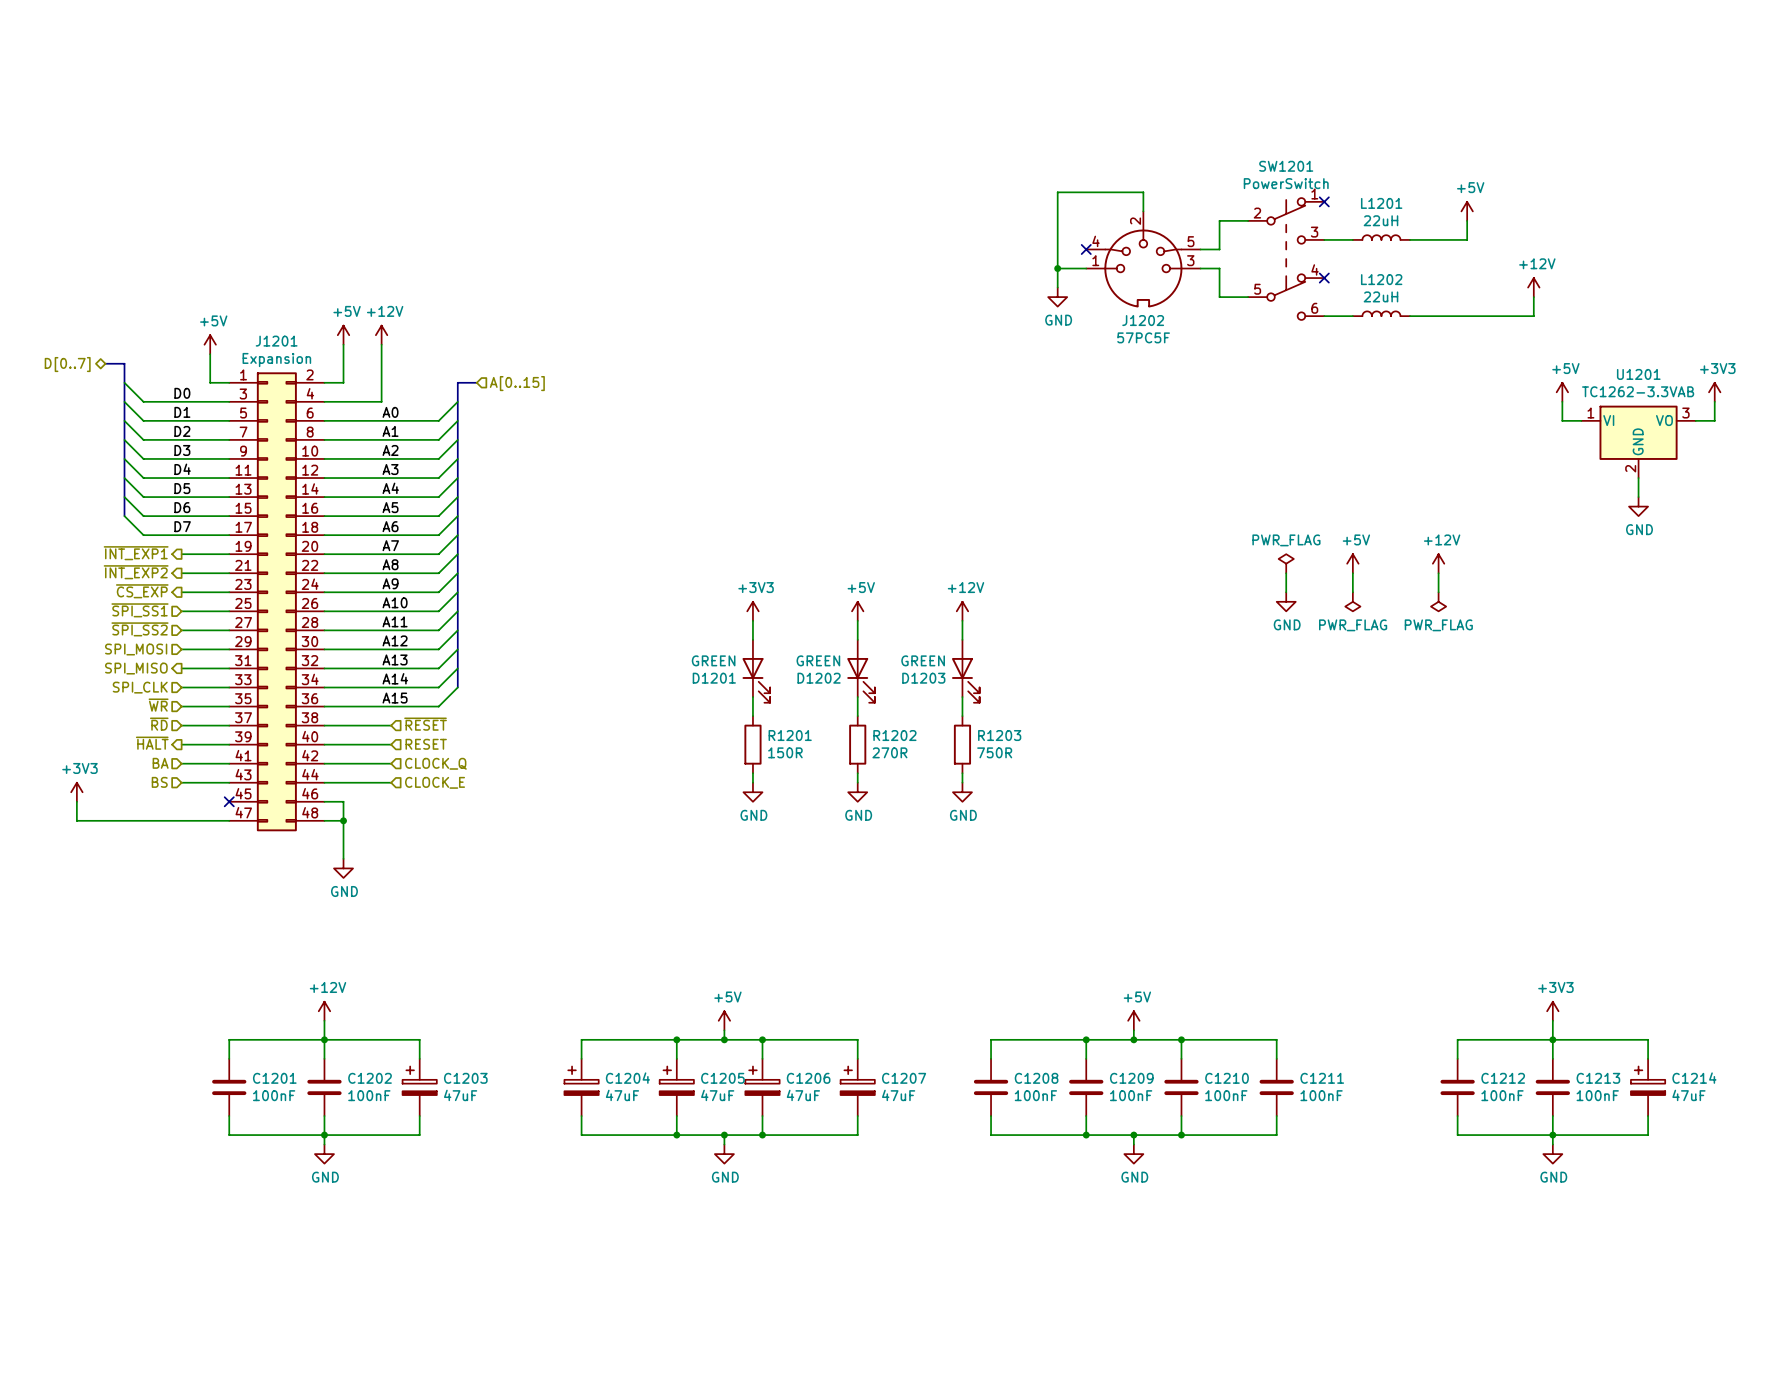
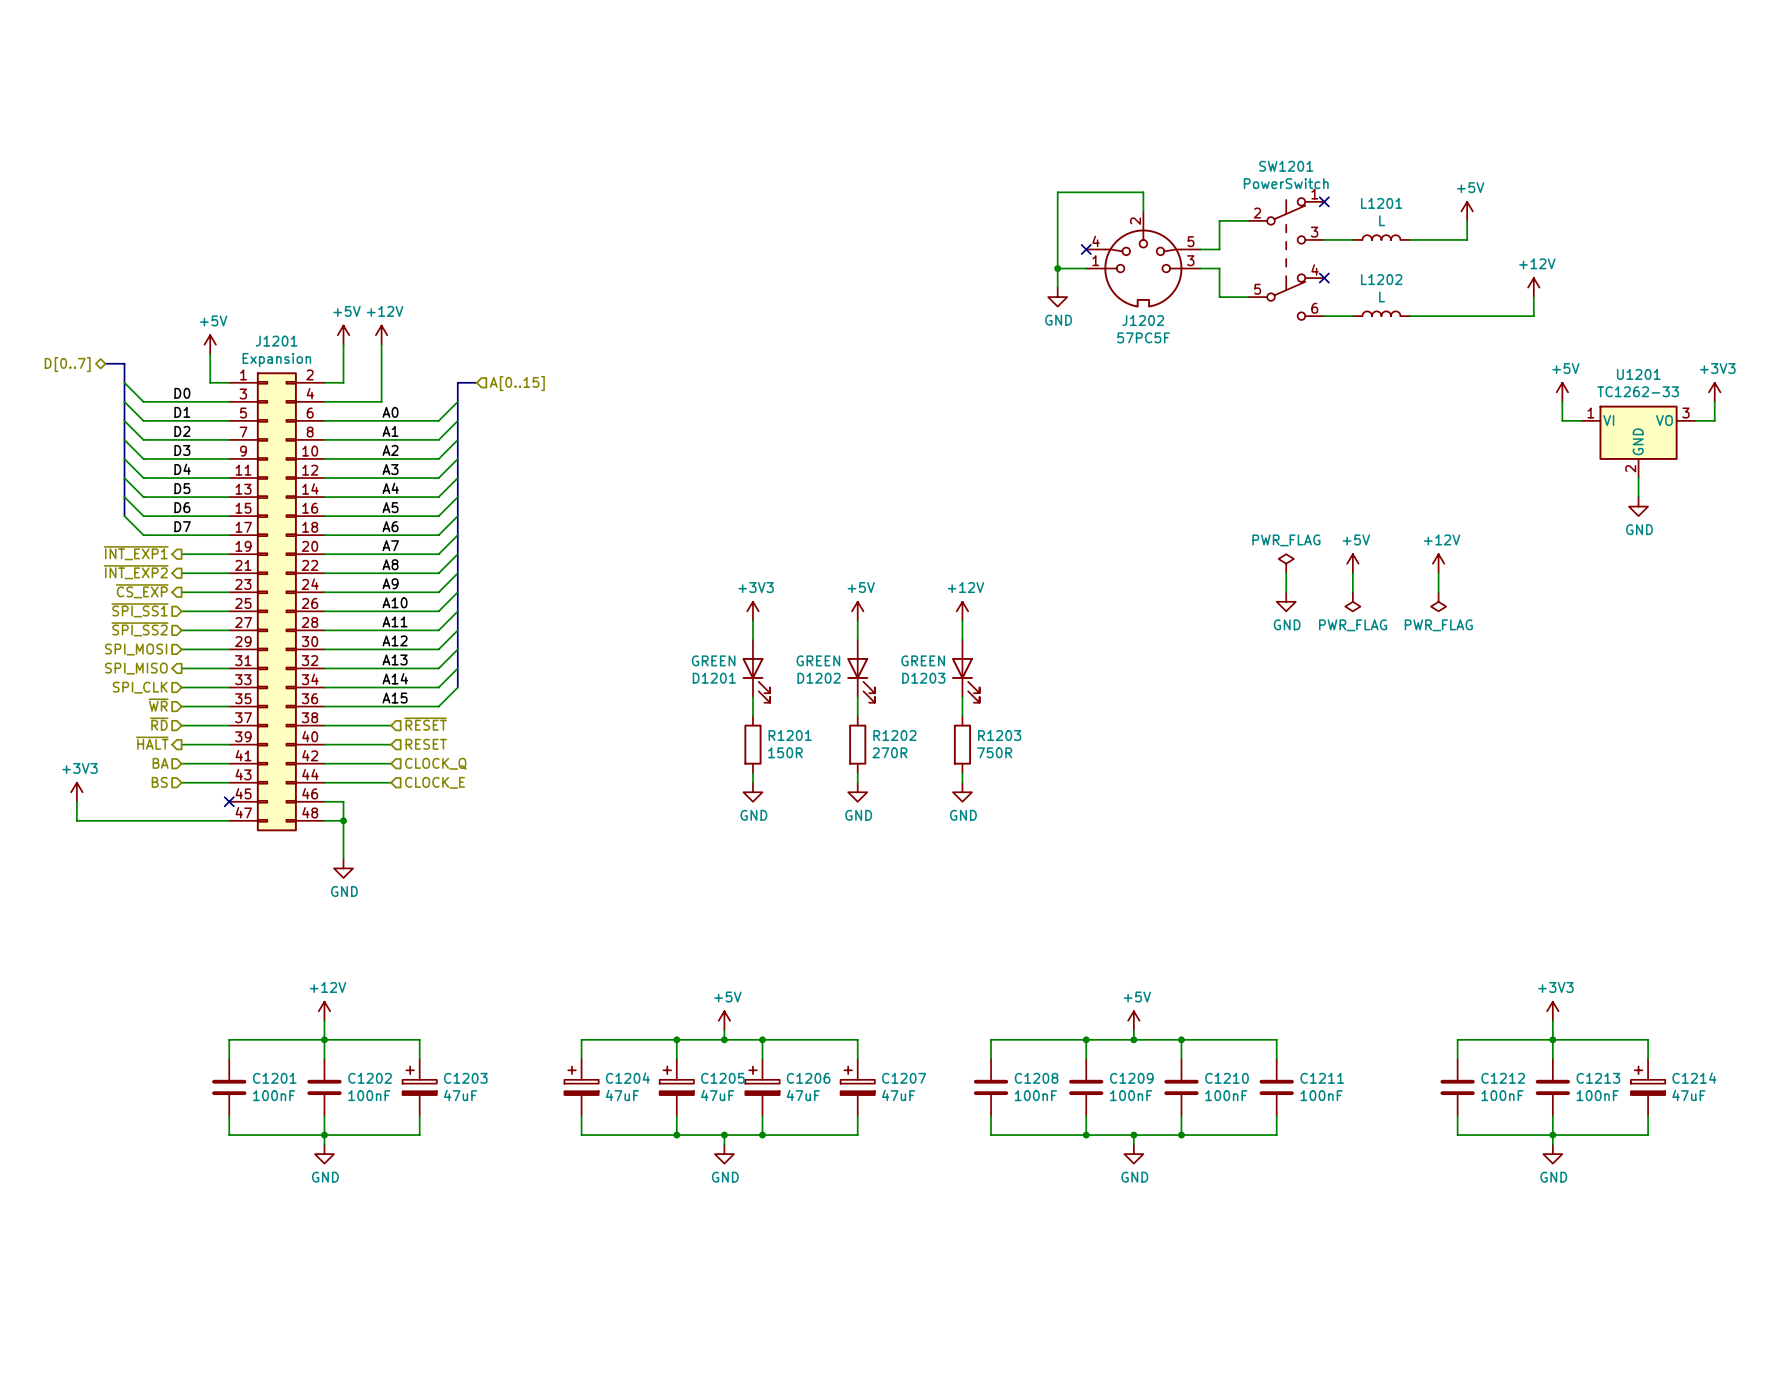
L1201 value: 22uH (1380, 220) -> L (1382, 220)
L1202 value: 22uH (1380, 296) -> L (1382, 296)
U1201 value: TC1262-3.3VAB (1638, 391) -> TC1262-33 (1638, 391)

